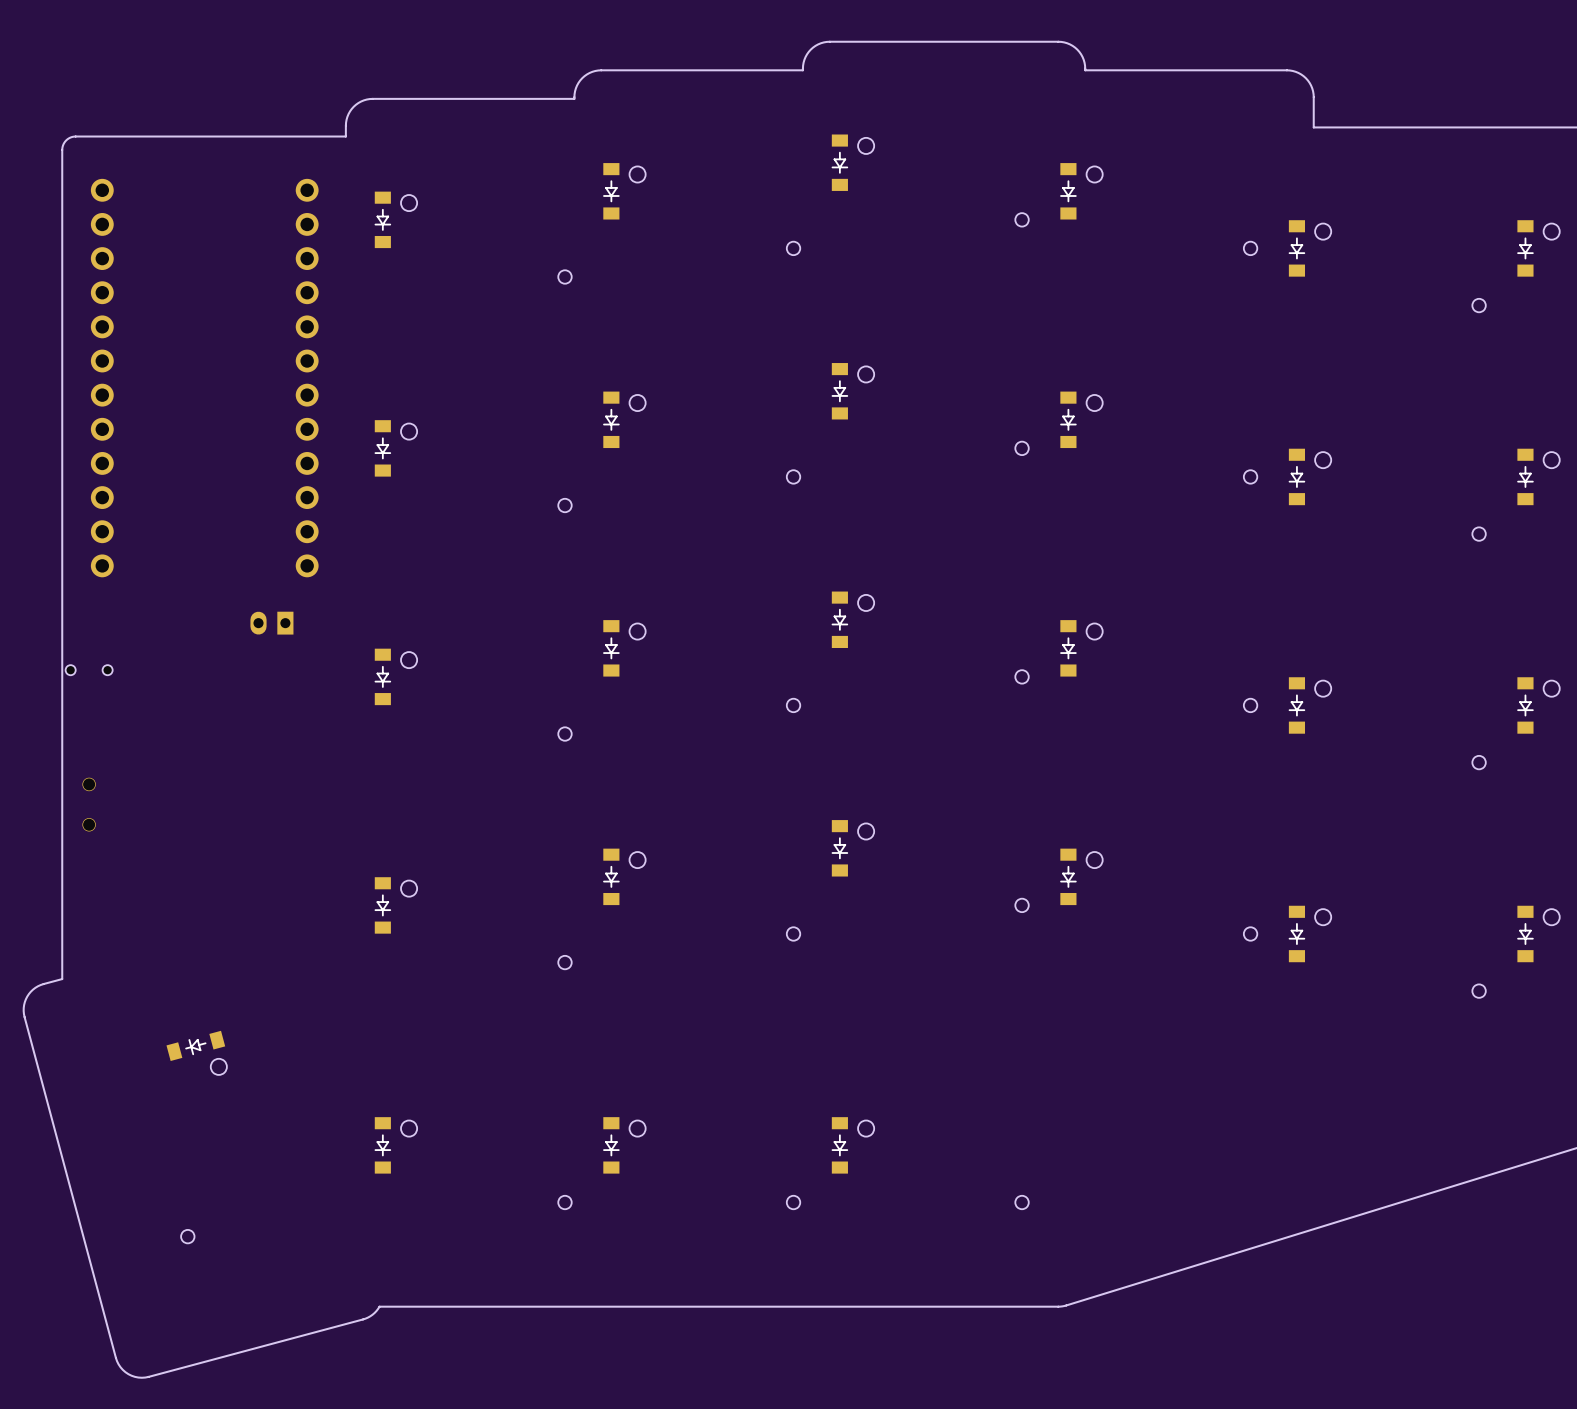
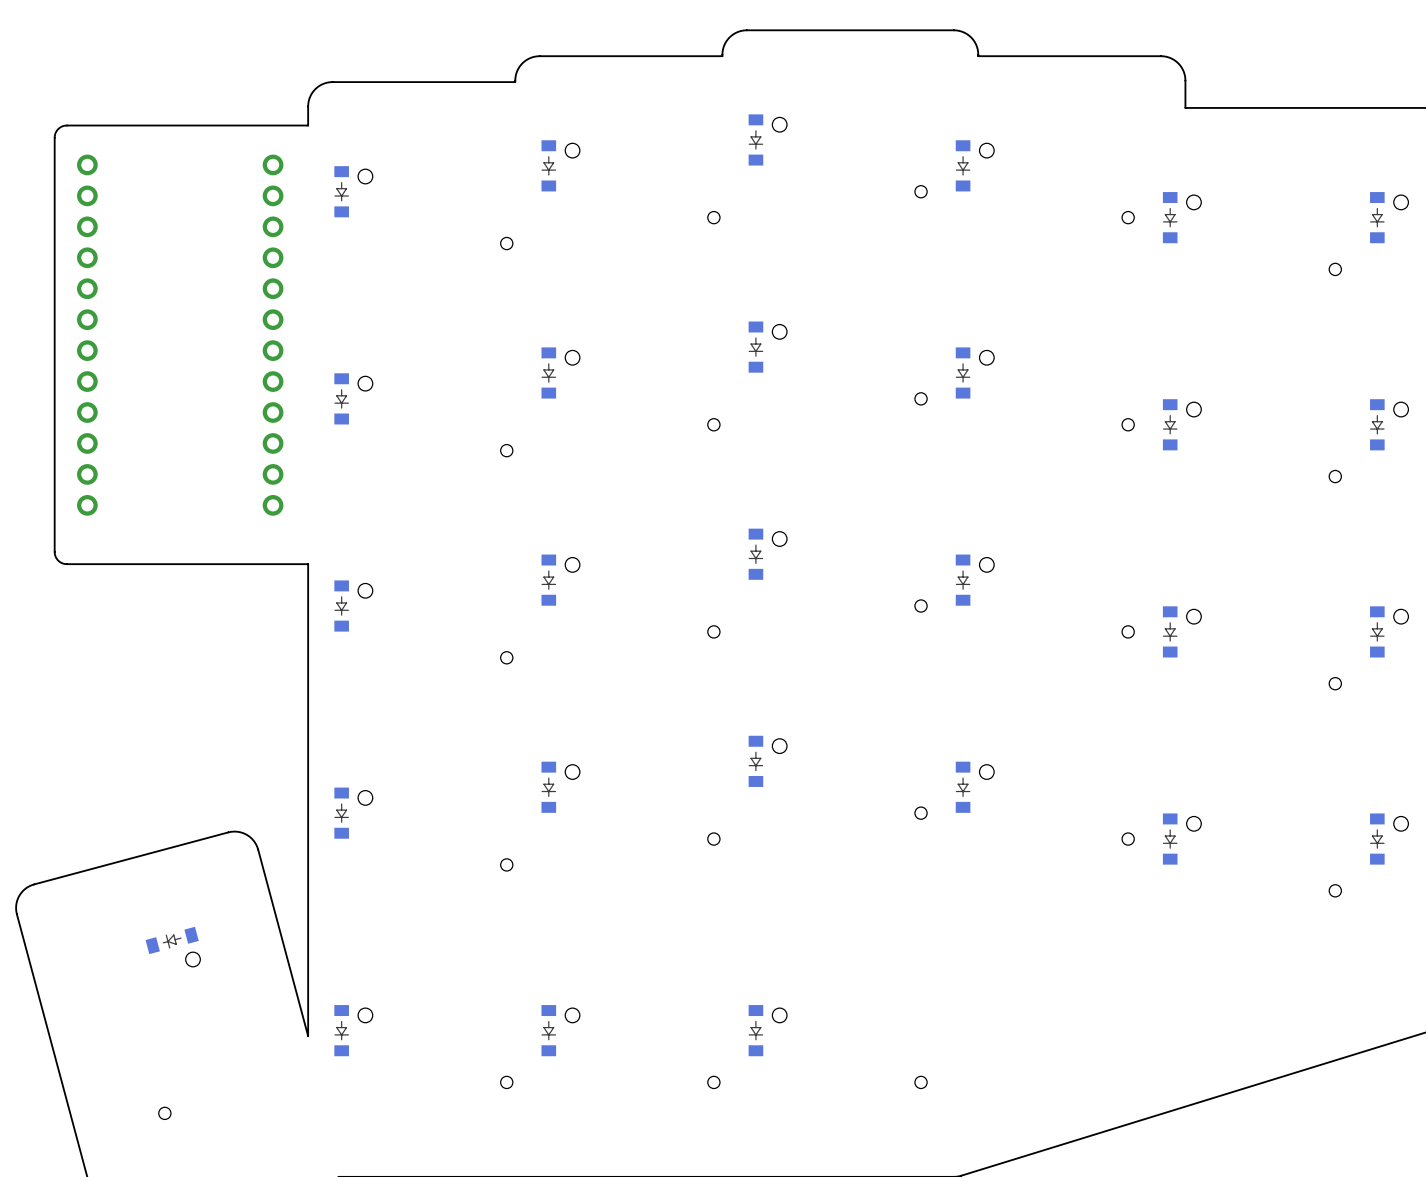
board edge: (345, 136) (75, 136) (67, 139) (63, 145) (62, 979) -> (308, 116) (308, 125) (65, 125) (57, 130) (54, 137) (54, 551) (56, 558) (61, 562) (66, 564) (308, 564) (308, 1036) (258, 849) (253, 841) (246, 834) (237, 831) (228, 832) (51, 879)
part: (271, 623) -> none
part: (89, 670) -> none
part: (89, 804) -> none

